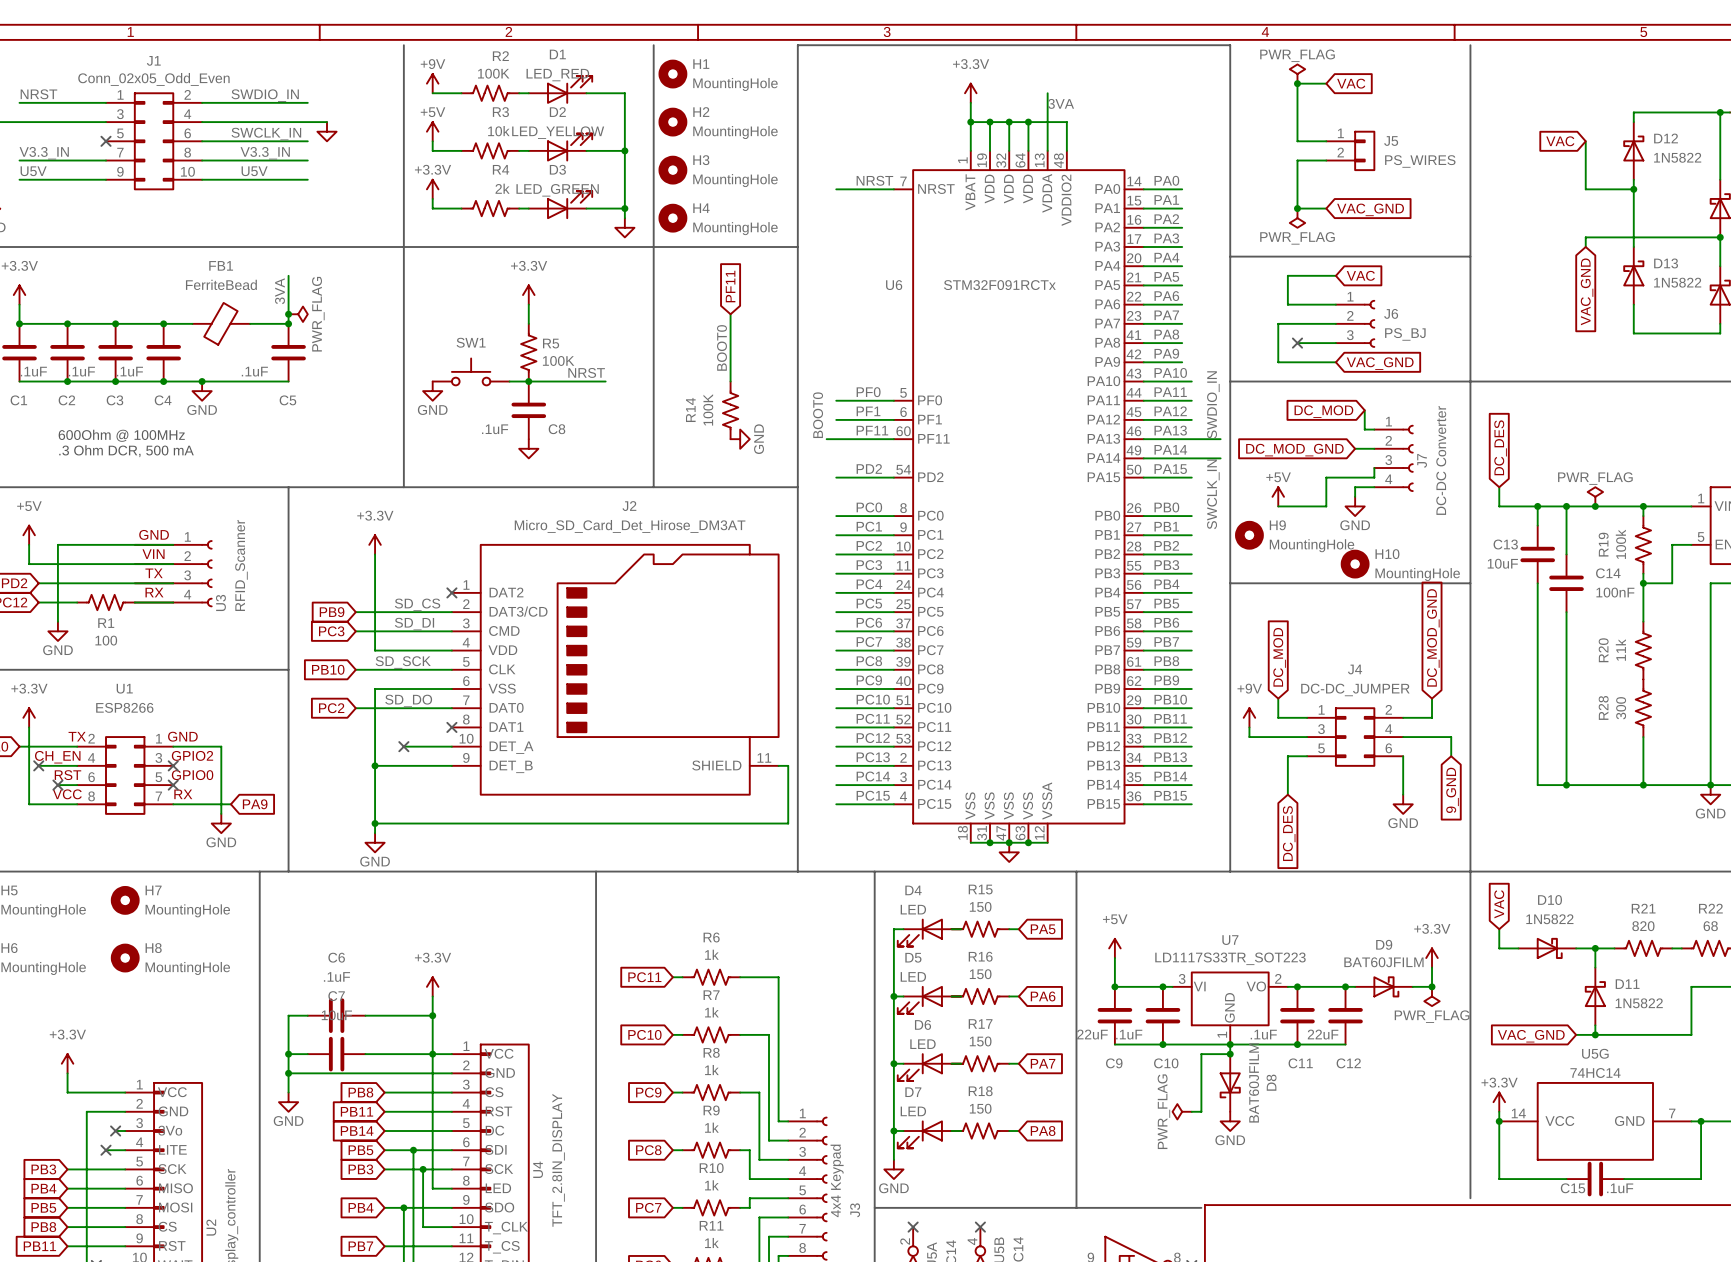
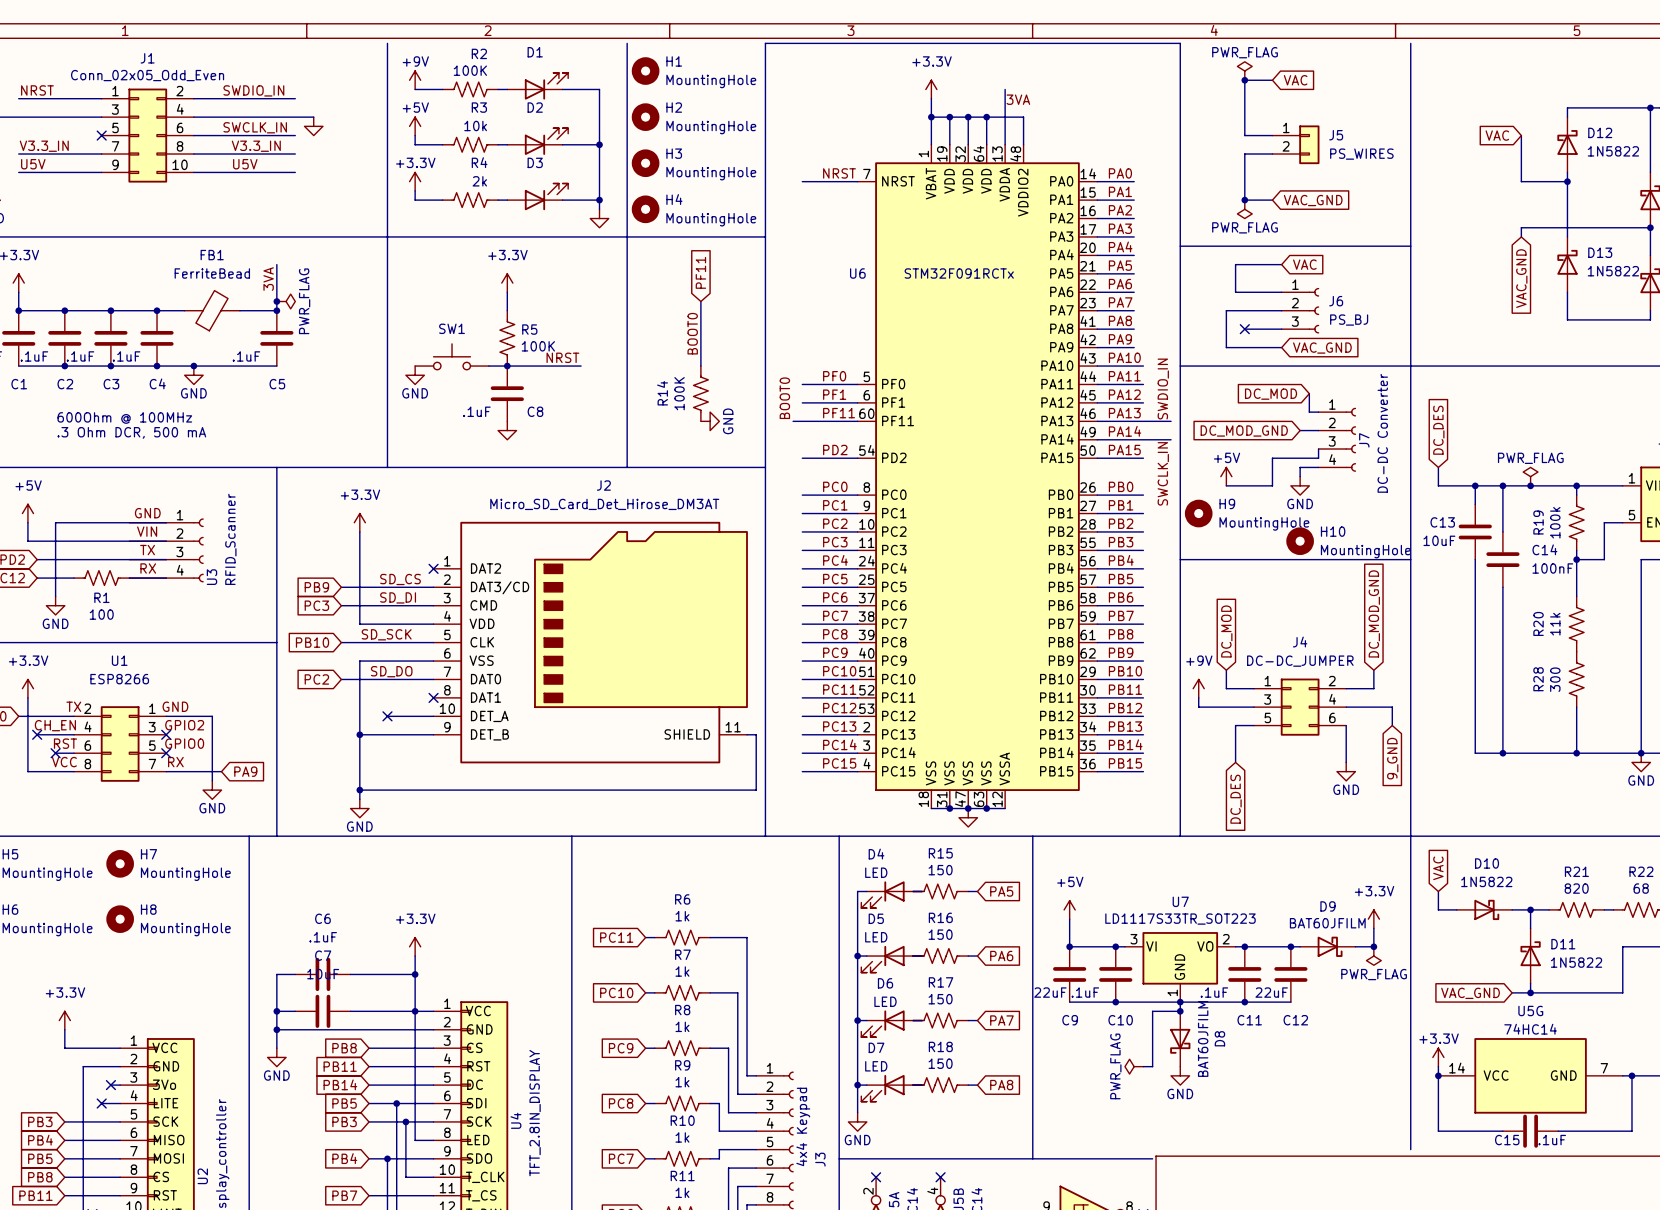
D1 value: LED_RED (557, 75) -> none
D2 value: LED_YELLOW (558, 132) -> none
D3 value: LED_GREEN (557, 190) -> none

